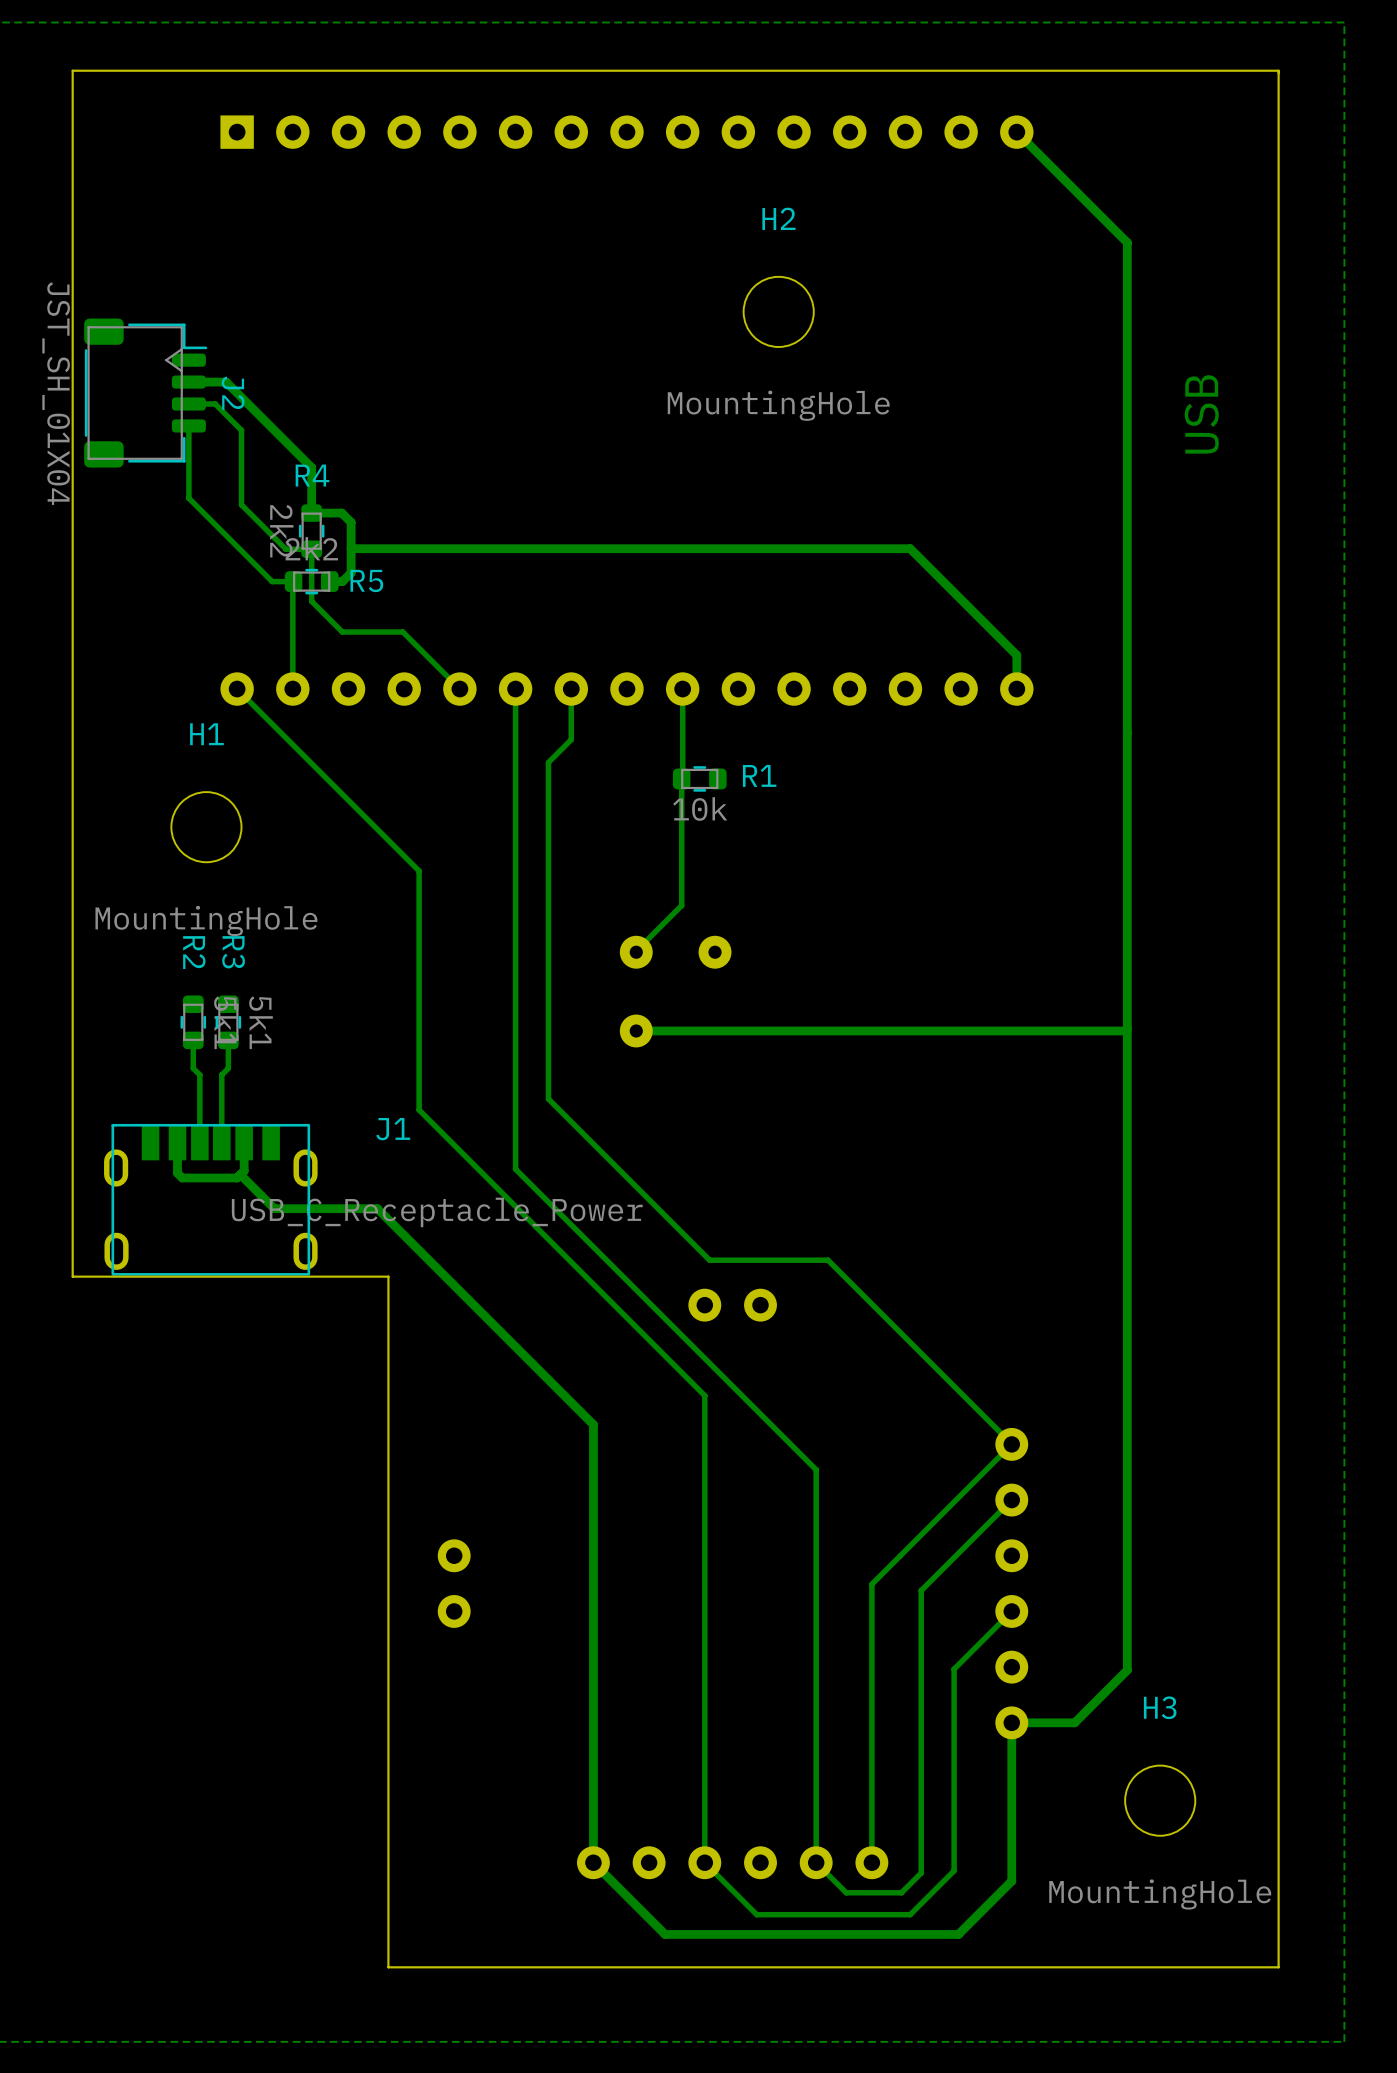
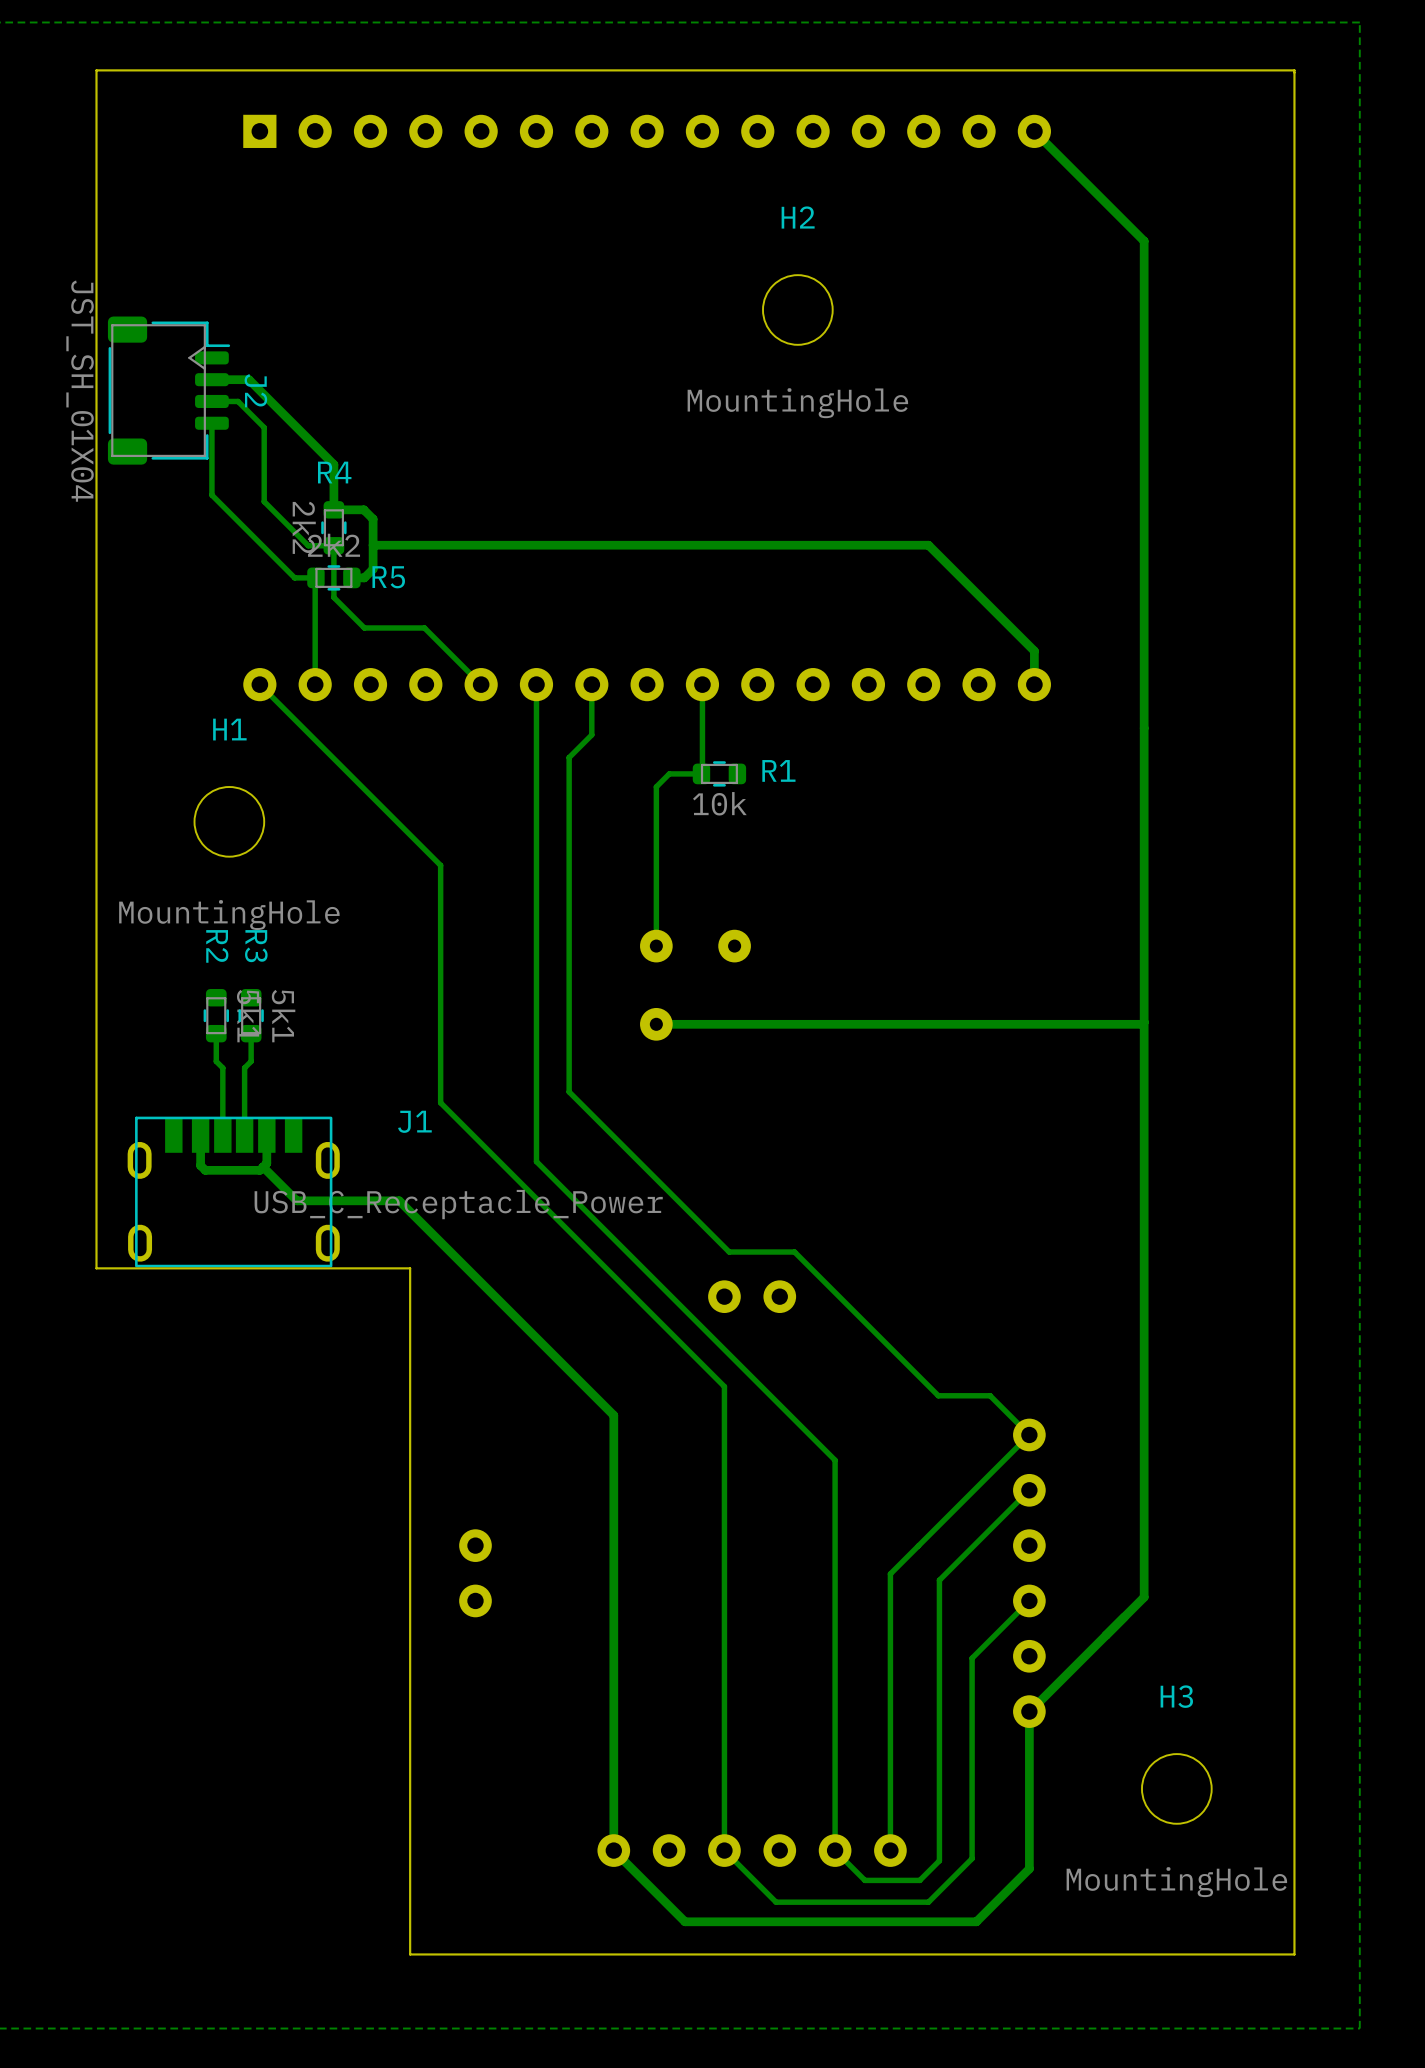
text: USB (1201, 414) -> none
bottom track: (681, 778) (681, 905) (636, 950) -> (701, 773) (669, 773) (656, 786) (656, 944)
bottom track: (775, 1260) (828, 1260) (1011, 1444) -> (794, 1252) (938, 1395) (990, 1395) (1029, 1434)
bottom track: (1127, 1607) (1127, 1670) (1074, 1722) (1011, 1722) -> (1144, 1597) (1029, 1711)

